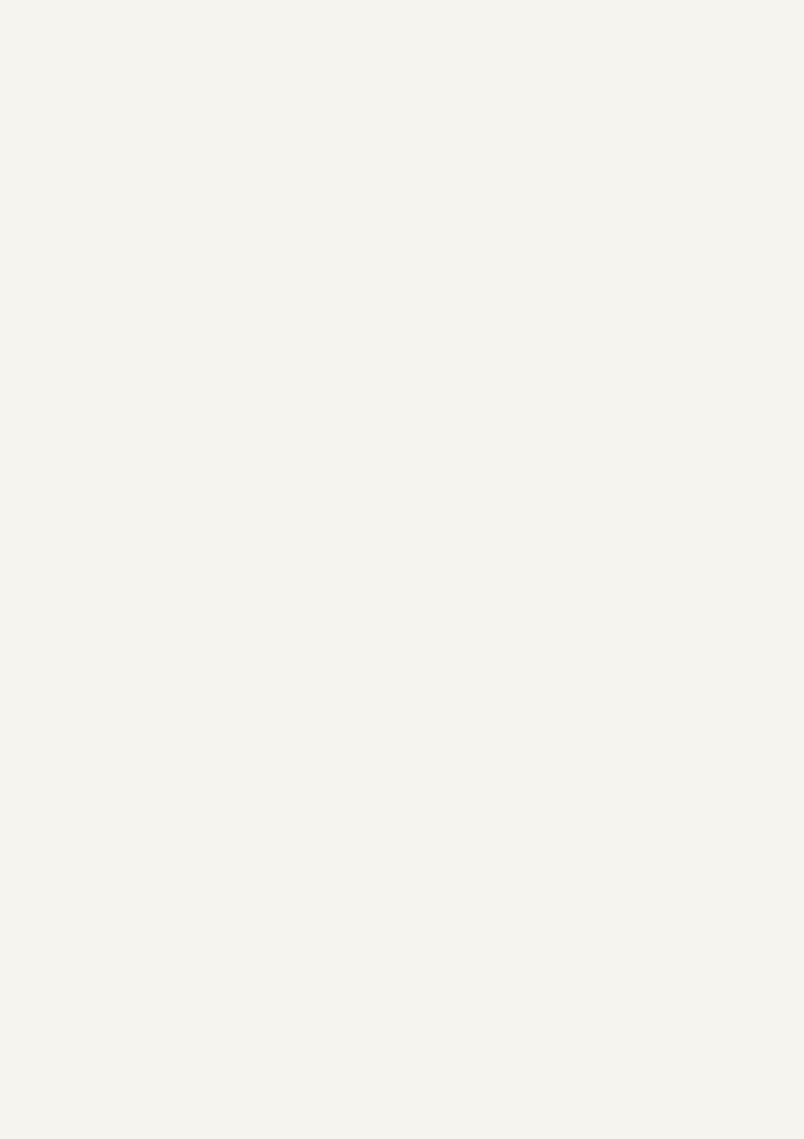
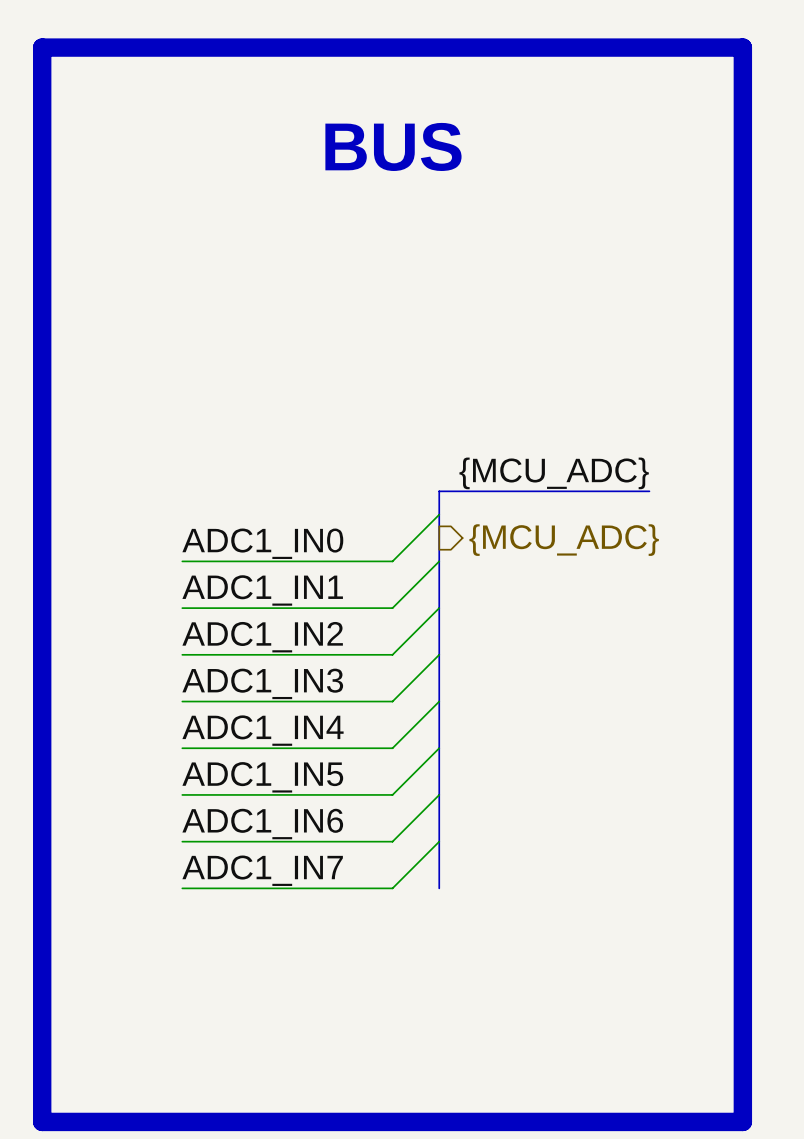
line: none -> (42, 47) (742, 47) (742, 1121) (42, 1121) (42, 47)
text: none -> BUS (393, 146)
label: none -> {MCU_ADC} (554, 473)
bus: none -> (649, 491) (439, 491) (439, 888)
wire: none -> (439, 514) (392, 561) (182, 561)
hierarchical label: none -> {MCU_ADC} (564, 540)
label: none -> ADC1_IN0 (262, 543)
wire: none -> (439, 561) (392, 608) (182, 608)
label: none -> ADC1_IN1 (262, 590)
wire: none -> (439, 608) (392, 654) (182, 654)
label: none -> ADC1_IN2 (262, 637)
wire: none -> (439, 654) (392, 701) (182, 701)
label: none -> ADC1_IN3 (262, 683)
wire: none -> (439, 701) (392, 748) (182, 748)
label: none -> ADC1_IN4 (263, 730)
wire: none -> (439, 748) (392, 794) (182, 794)
label: none -> ADC1_IN5 (262, 777)
wire: none -> (439, 794) (392, 841) (182, 841)
label: none -> ADC1_IN6 (262, 824)
wire: none -> (439, 841) (392, 888) (182, 888)
label: none -> ADC1_IN7 (262, 870)

